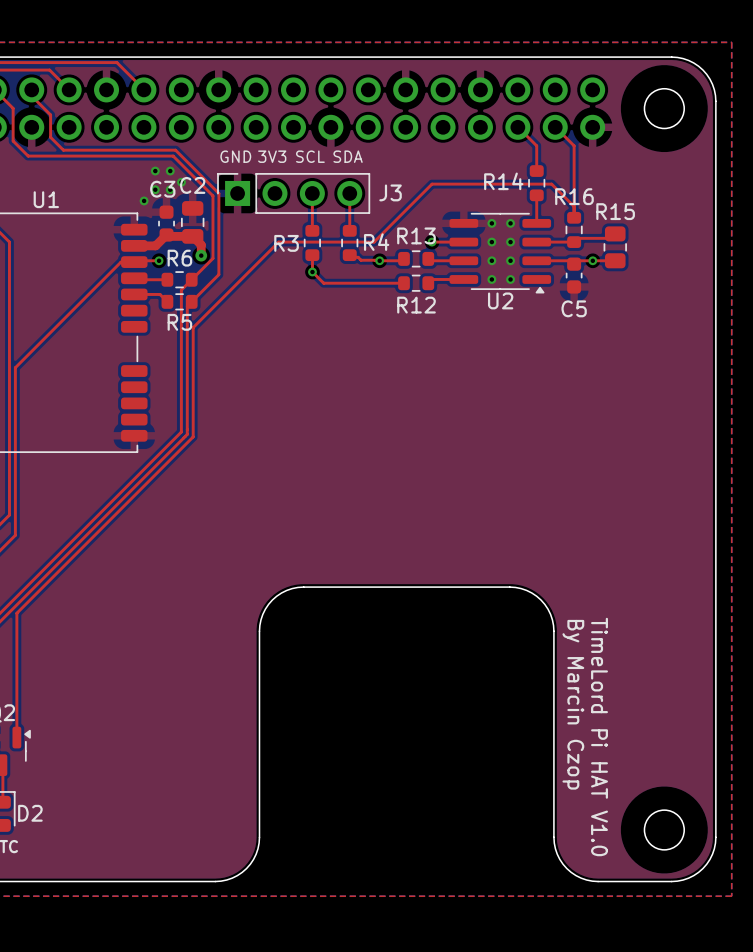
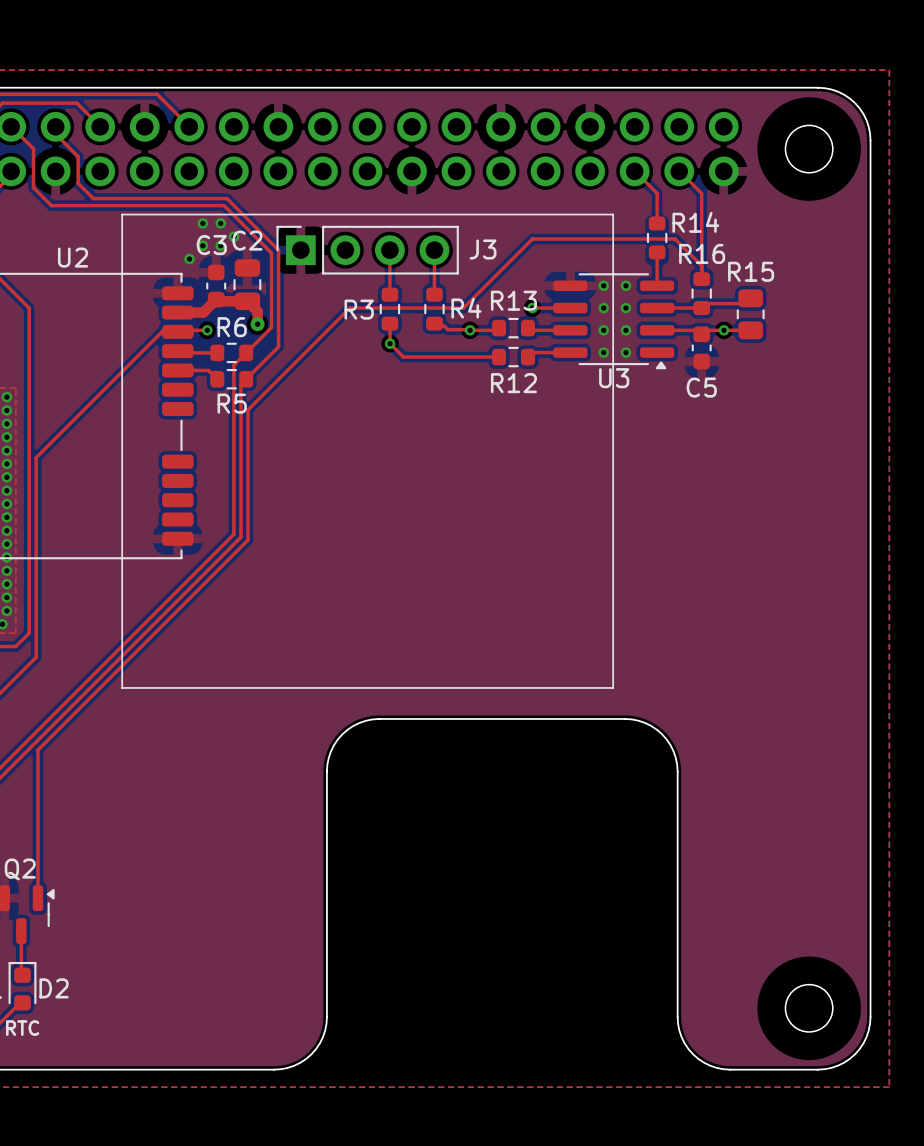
text: GND (235, 156) -> none
text: 3V3 (272, 156) -> none
text: SCL (310, 156) -> none
text: SDA (348, 156) -> none
line: none -> (122, 214) (613, 214) (613, 687) (122, 687) (122, 214)
R14 name position: R14 (503, 181) -> R14 (695, 222)
U1 name: U1 (46, 199) -> U2 (73, 257)
U2 name: U2 (500, 300) -> U3 (614, 378)
text: By Marcin Czop (573, 704) -> none
text: TimeLord Pi HAT V1.0 (599, 737) -> none

